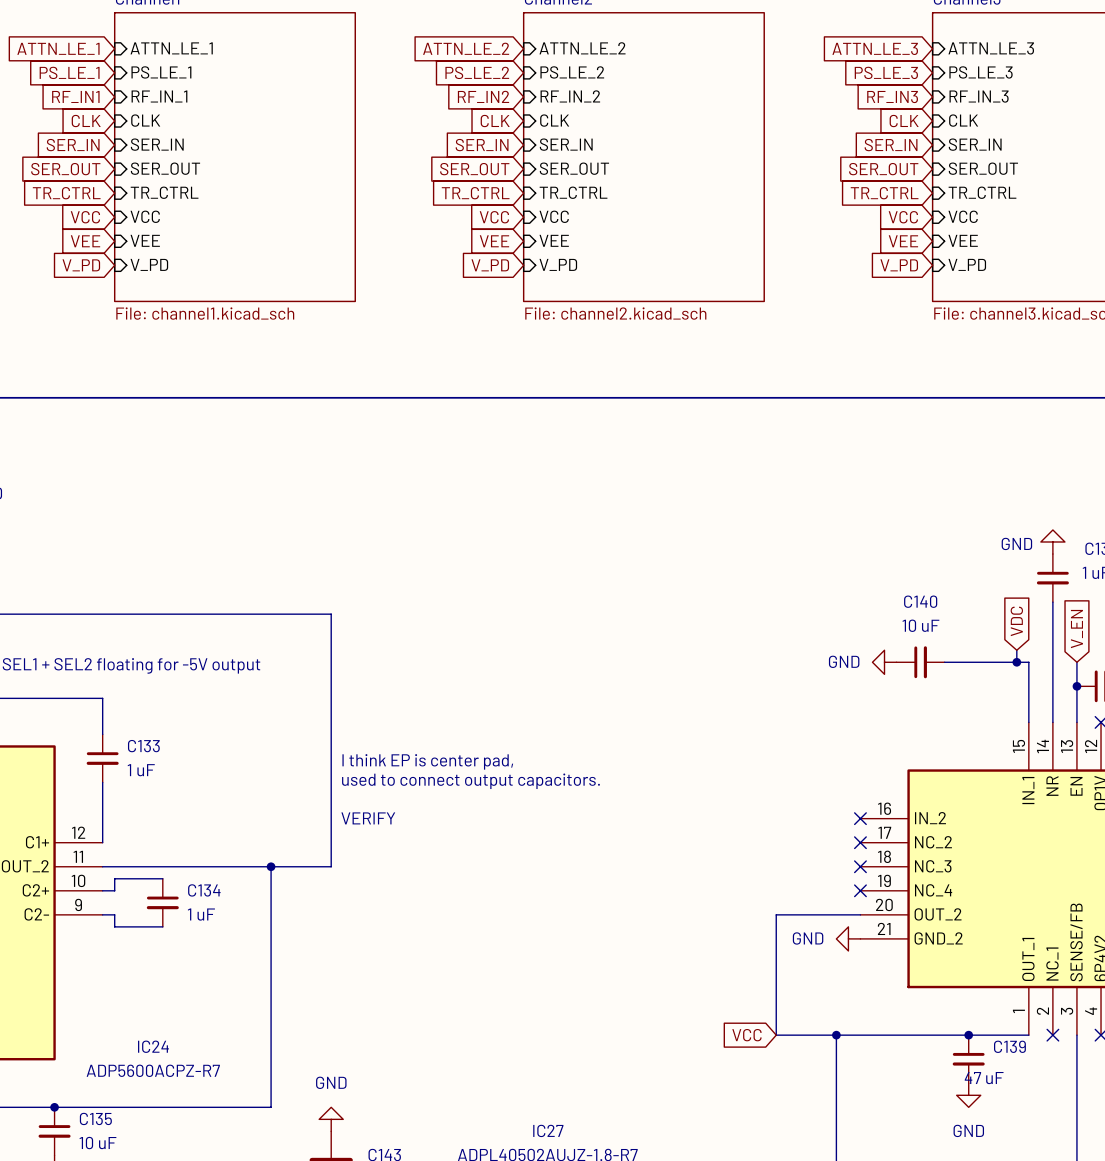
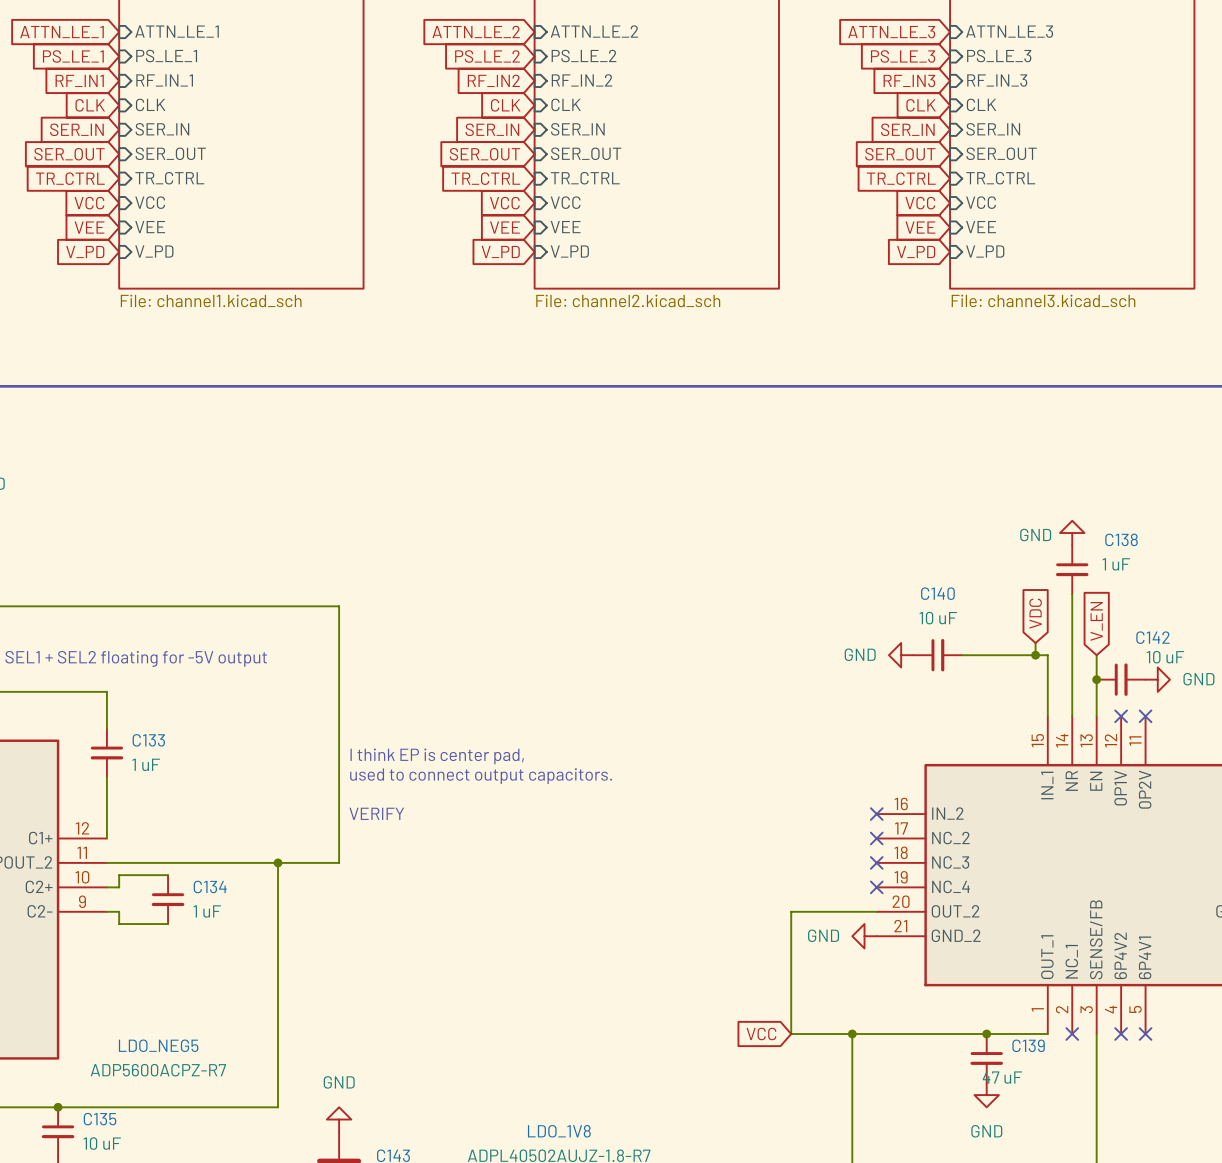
IC24 name: IC24 (153, 1046) -> LDO_NEG5 (158, 1045)
IC27 name: IC27 (548, 1130) -> LDO_1V8 (559, 1131)

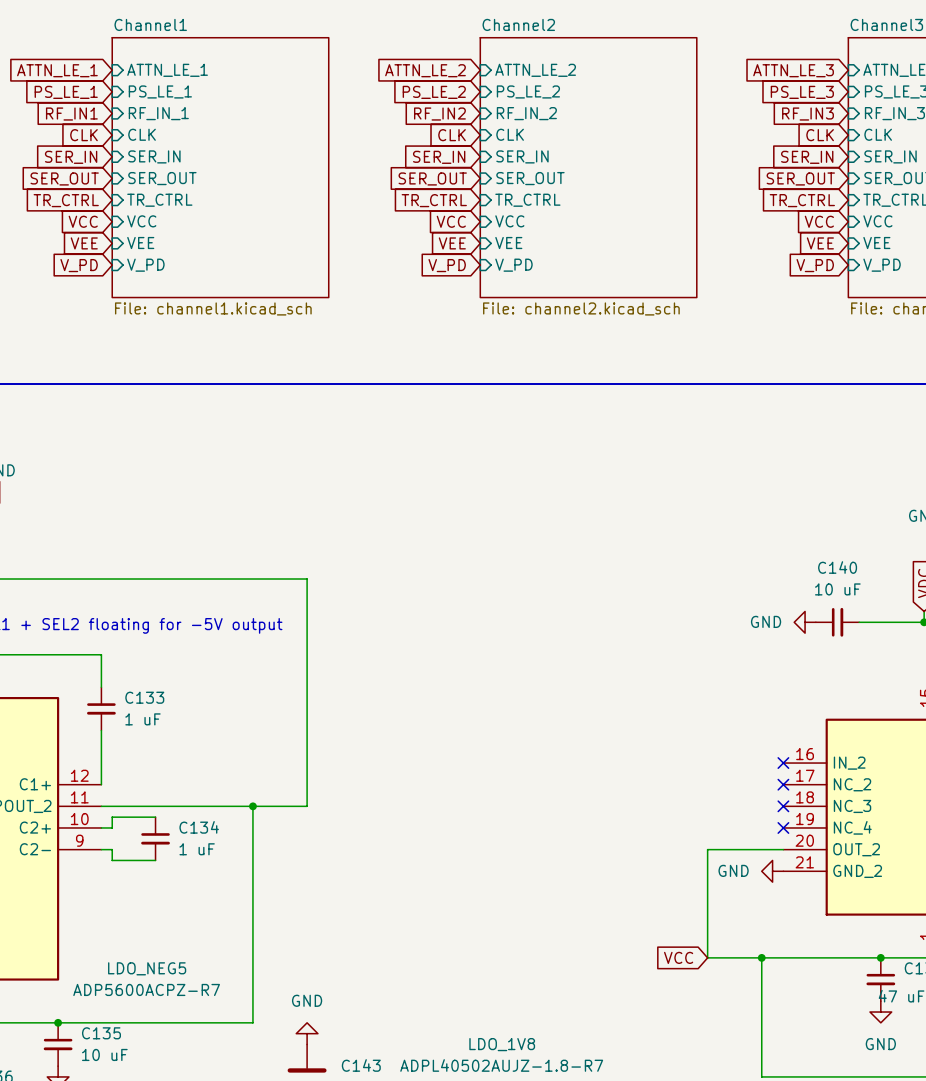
text: I think EP is center pad, (437, 756) -> none
text: used to connect output capacitors. (481, 776) -> none
text: VERIFY (376, 813) -> none

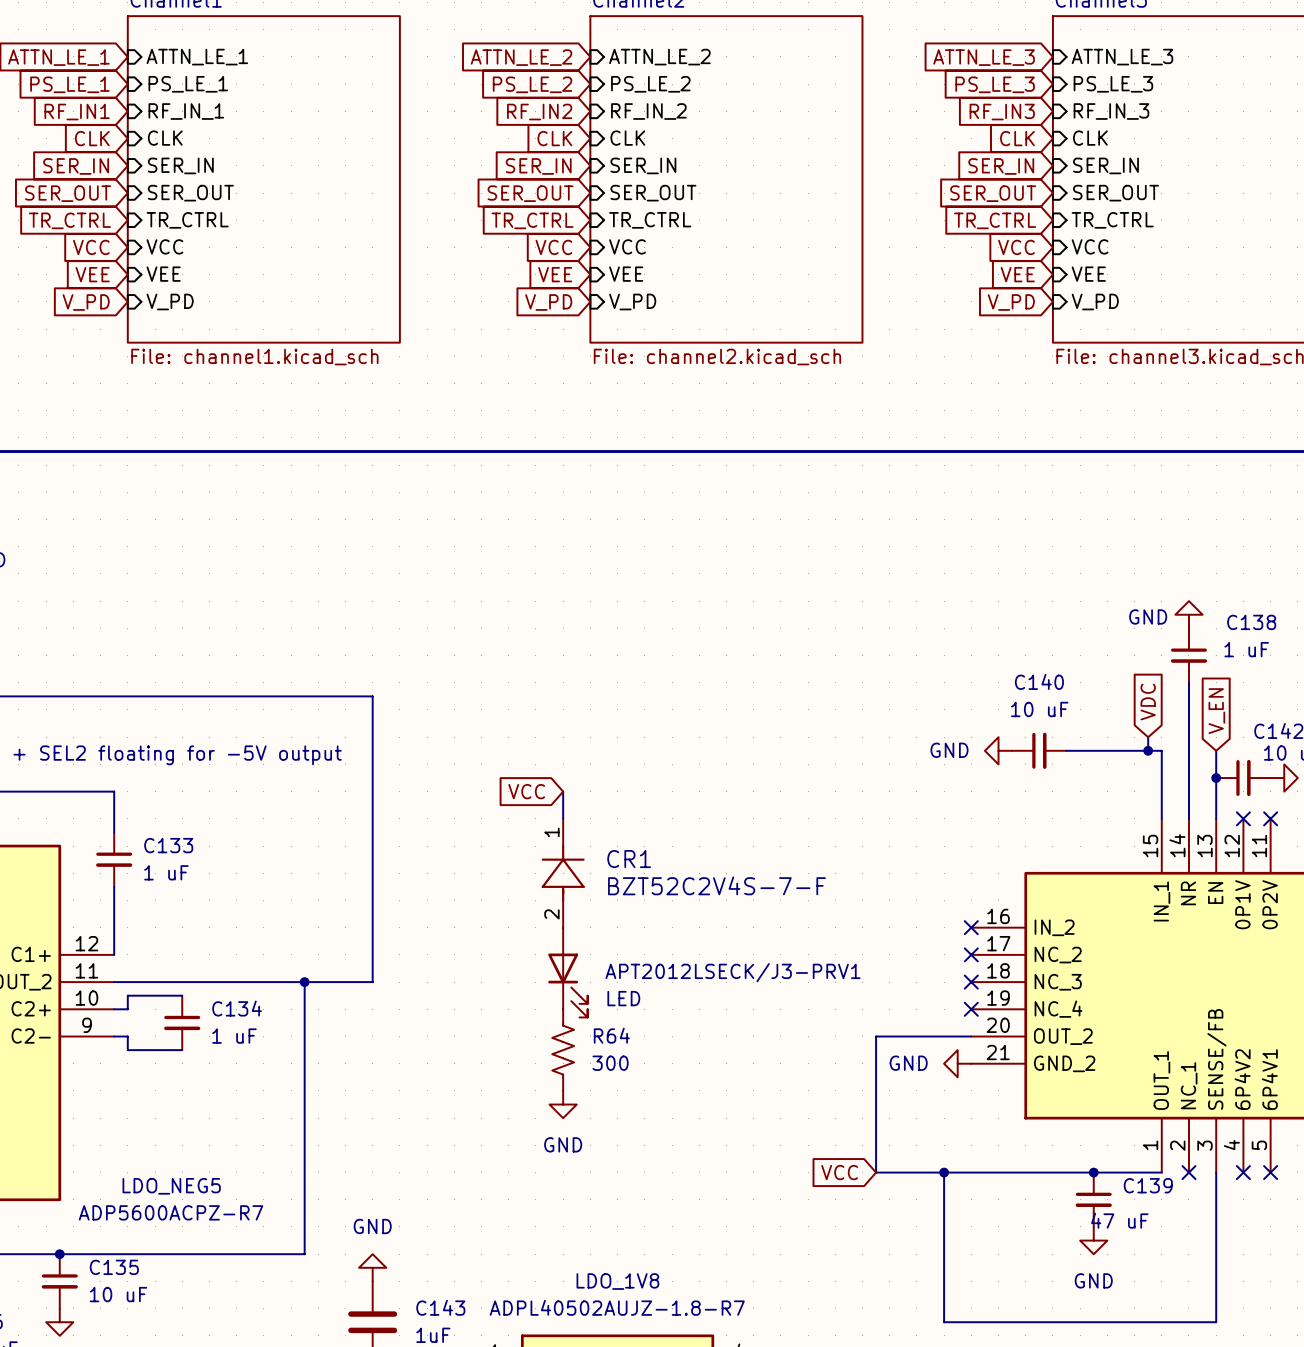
global label: none -> VCC (526, 791)
wire: none -> (563, 791) (563, 818)
CR1: none -> BZT52C2V4S-7-F (563, 873)
APT2012LSECK/J3-PRV1: none -> LED (567, 972)
R64: none -> 300 (563, 1050)
power symbol: none -> GND (563, 1104)

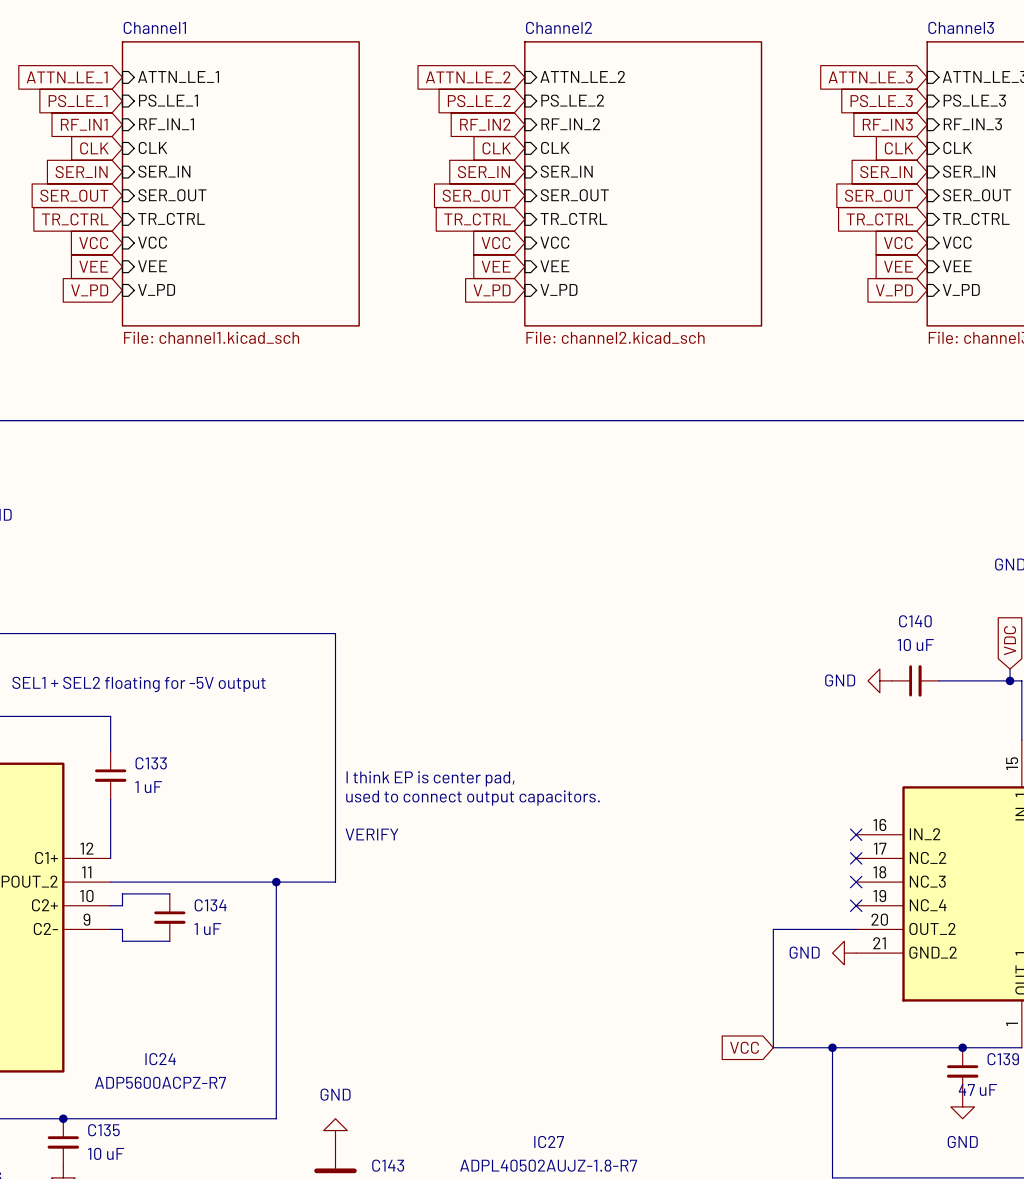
global label: VCC (526, 791) -> none
wire: (563, 791) (563, 818) -> none
text: none -> I think EP is center pad, (430, 778)
CR1: BZT52C2V4S-7-F (563, 873) -> none
text: none -> used to connect output capacitors. (473, 797)
text: none -> VERIFY (372, 834)
APT2012LSECK/J3-PRV1: LED (567, 972) -> none
R64: 300 (563, 1050) -> none
power symbol: GND (563, 1104) -> none
LDO_NEG5 name: LDO_NEG5 (171, 1186) -> IC24 (160, 1059)
LDO_1V8 name: LDO_1V8 (617, 1281) -> IC27 (549, 1141)

